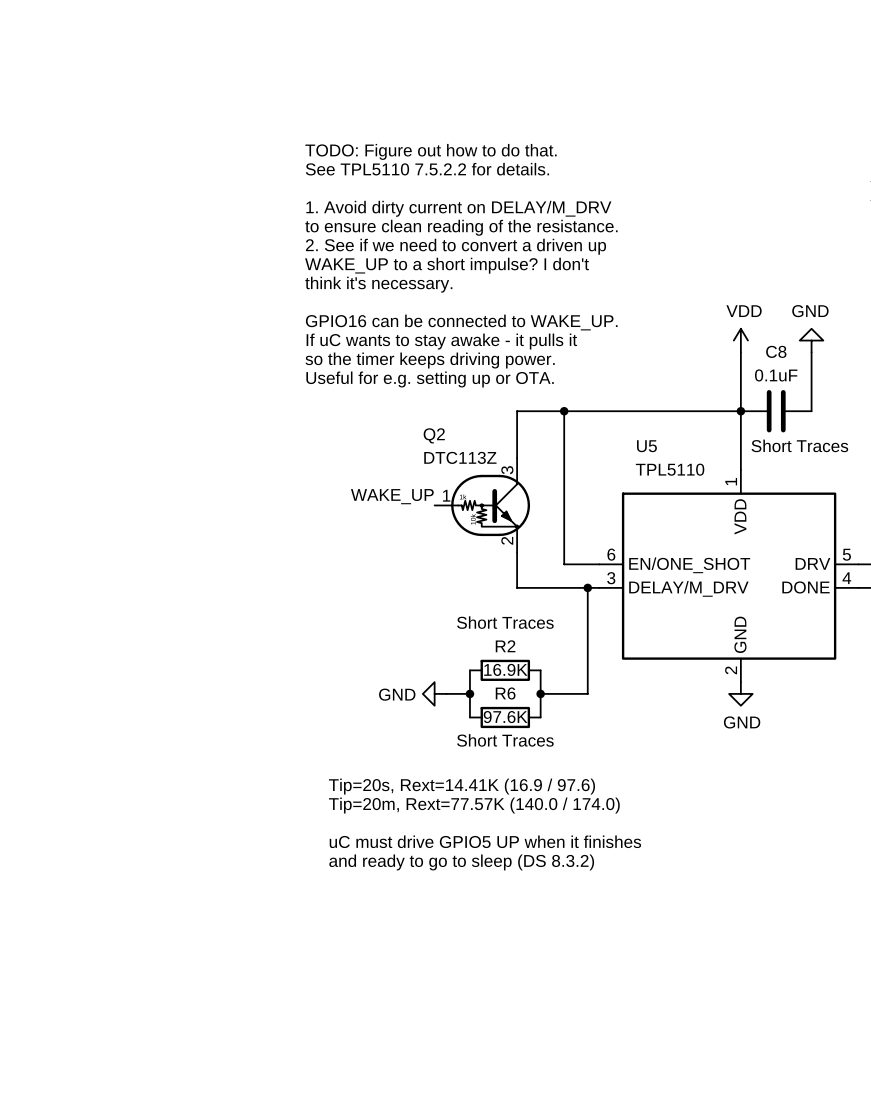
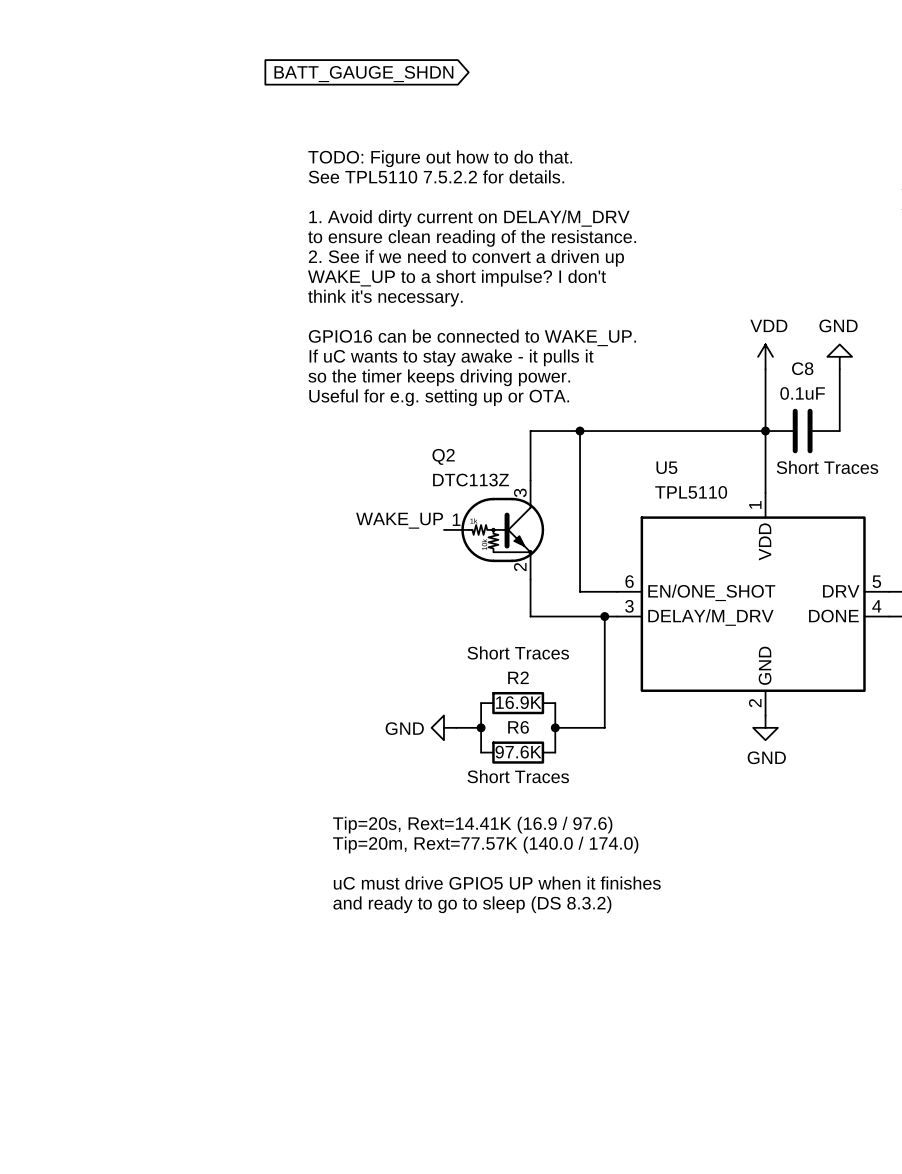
global label: none -> BATT_GAUGE_SHDN (363, 74)

